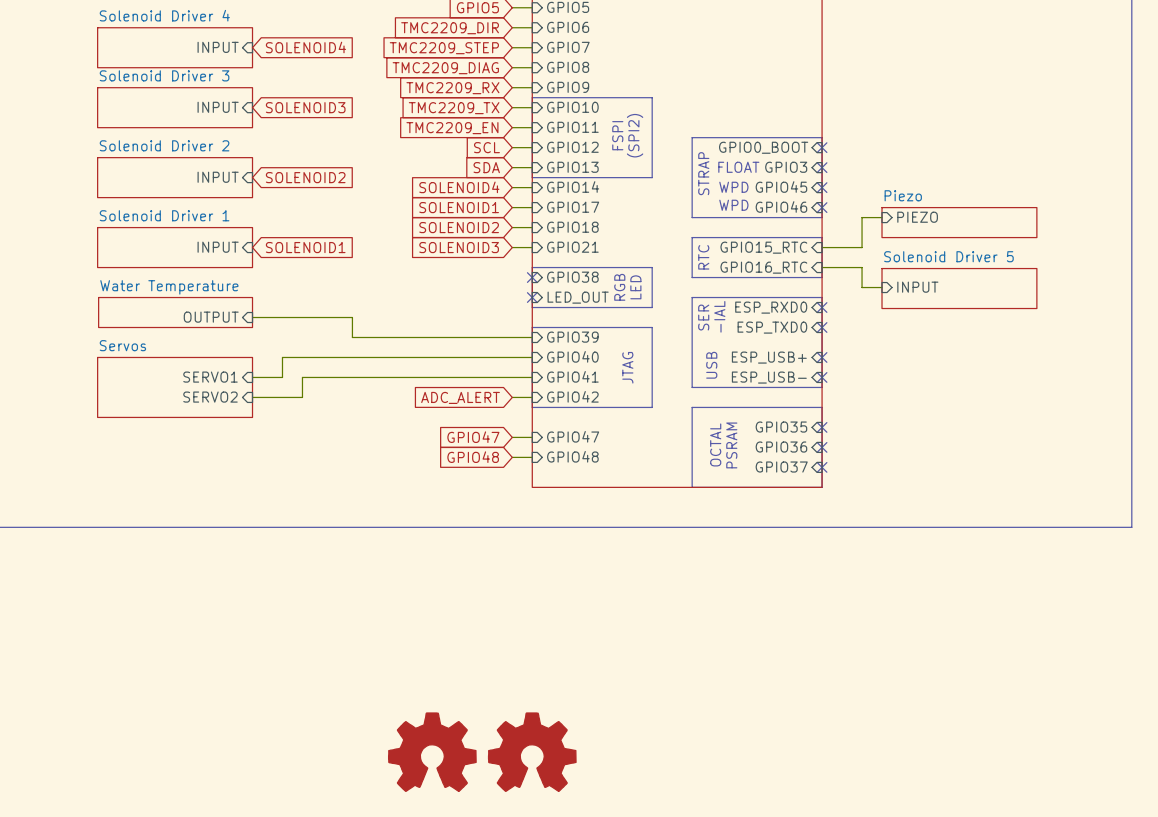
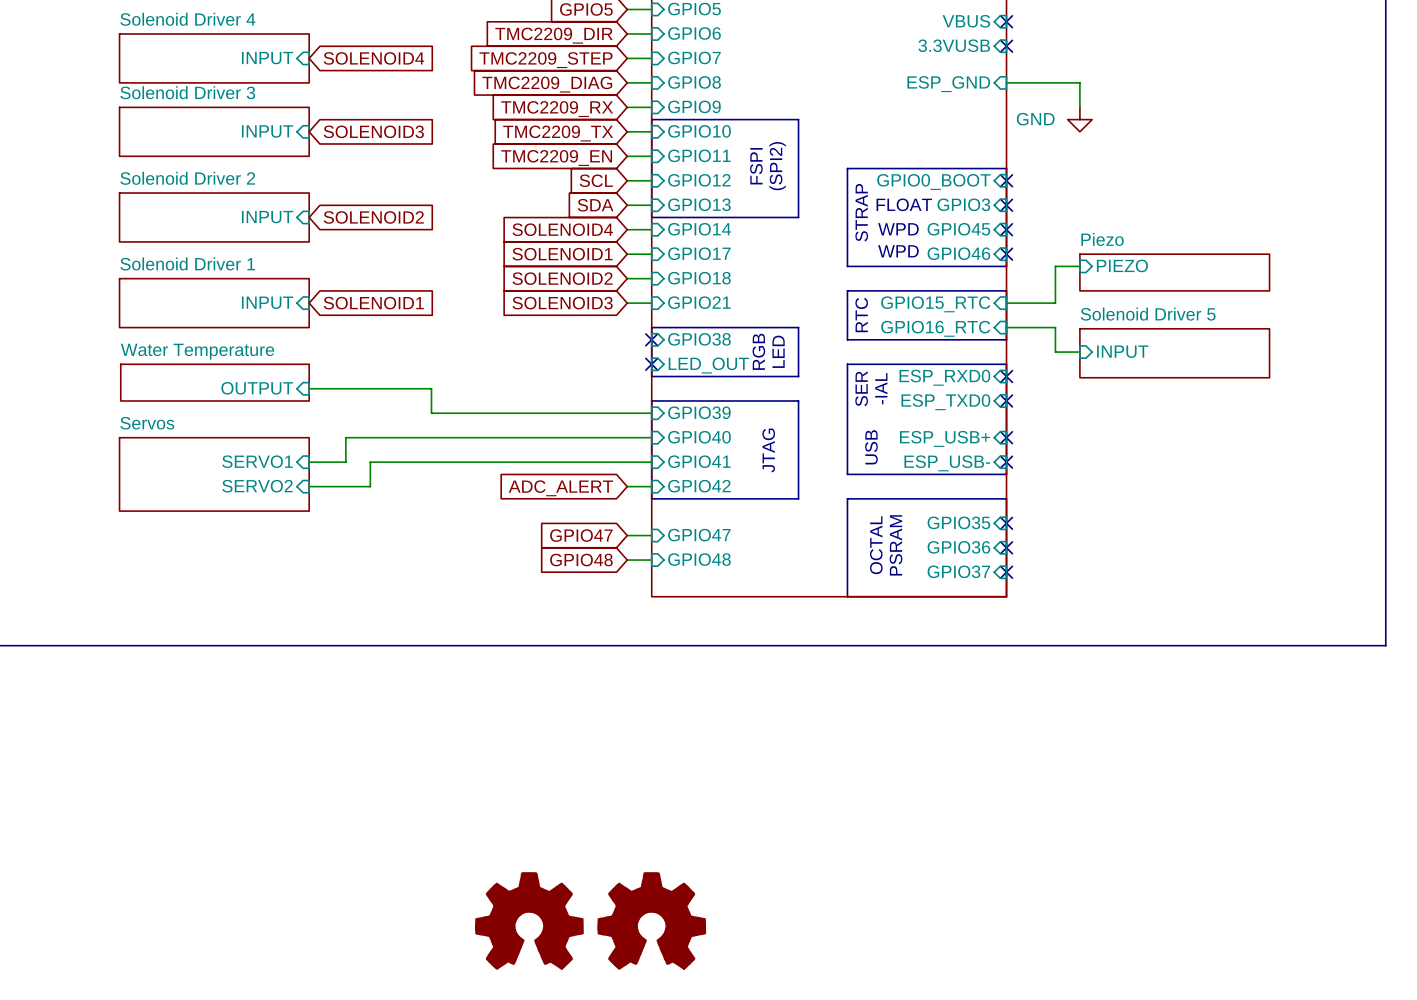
sheet pin: none -> VBUS (966, 21)
no-connect mark: none -> (1006, 21)
sheet pin: none -> 3.3VUSB (954, 45)
no-connect mark: none -> (1006, 46)
sheet pin: none -> ESP_GND (948, 84)
wire: none -> (1006, 82) (1079, 82) (1079, 107)
power symbol: none -> GND (1079, 119)

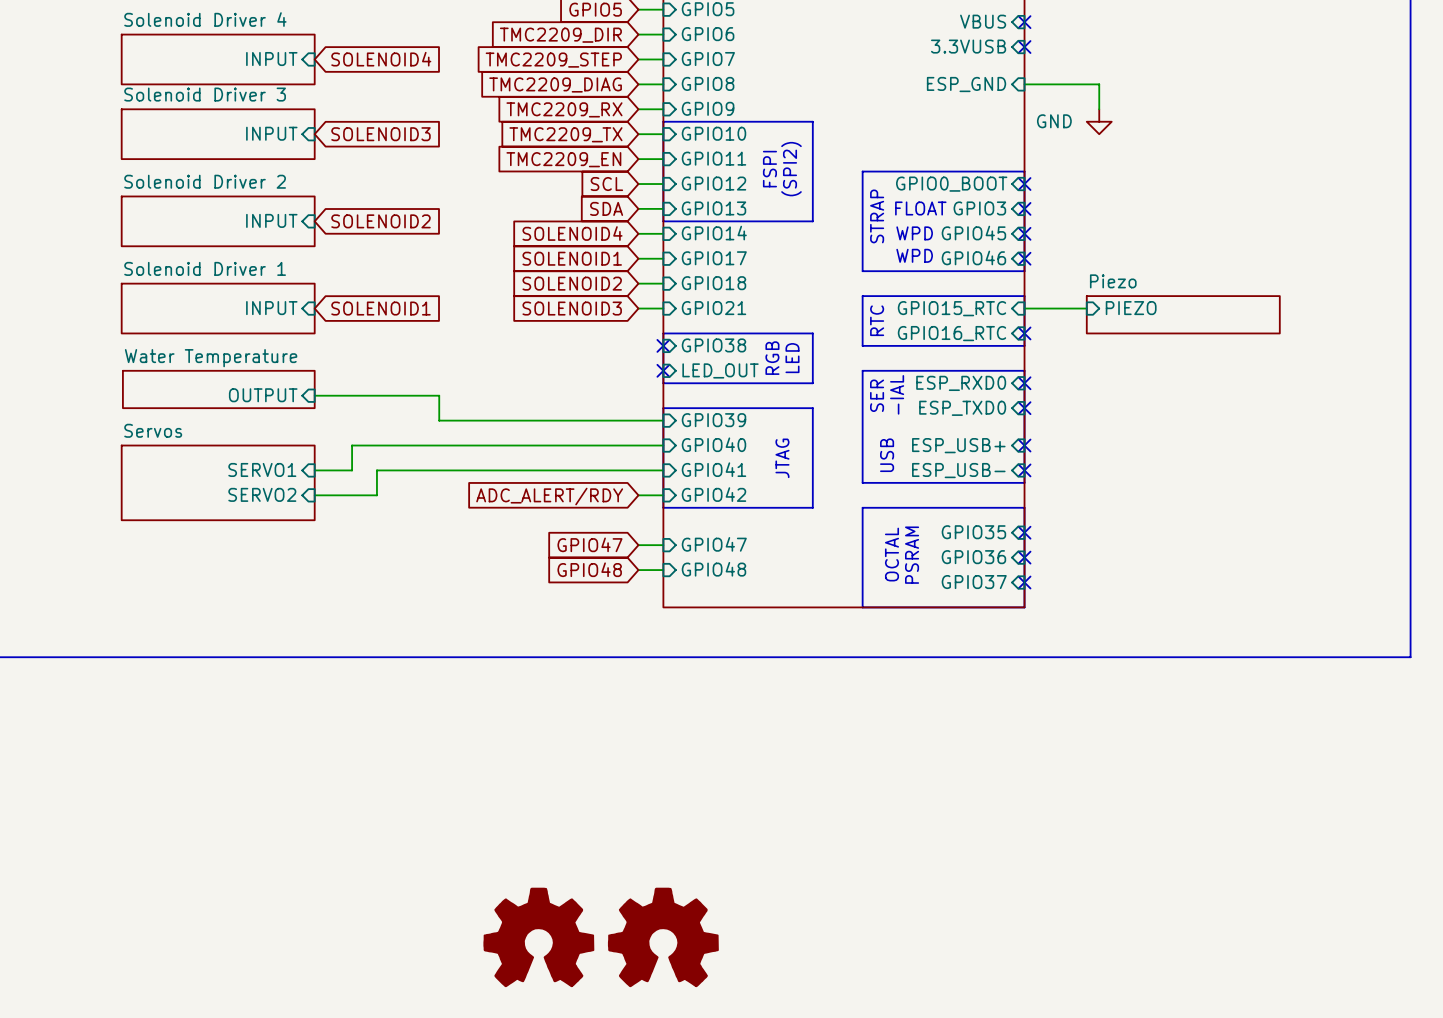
sheet pin position: PIEZO (1122, 265) -> PIEZO (1131, 308)
wire: (1079, 266) (1055, 266) (1055, 303) -> (1086, 308) (1074, 308)
sheet Piezo position: (1174, 272) -> (1183, 314)
wire: (1006, 327) (1055, 327) (1055, 352) (1079, 352) -> none
no-connect mark: none -> (1024, 333)
sheet pin: INPUT (1122, 351) -> none
sheet Solenoid Driver 5: (1174, 353) -> none
global label: ADC_ALERT (560, 488) -> ADC_ALERT/RDY (549, 496)

